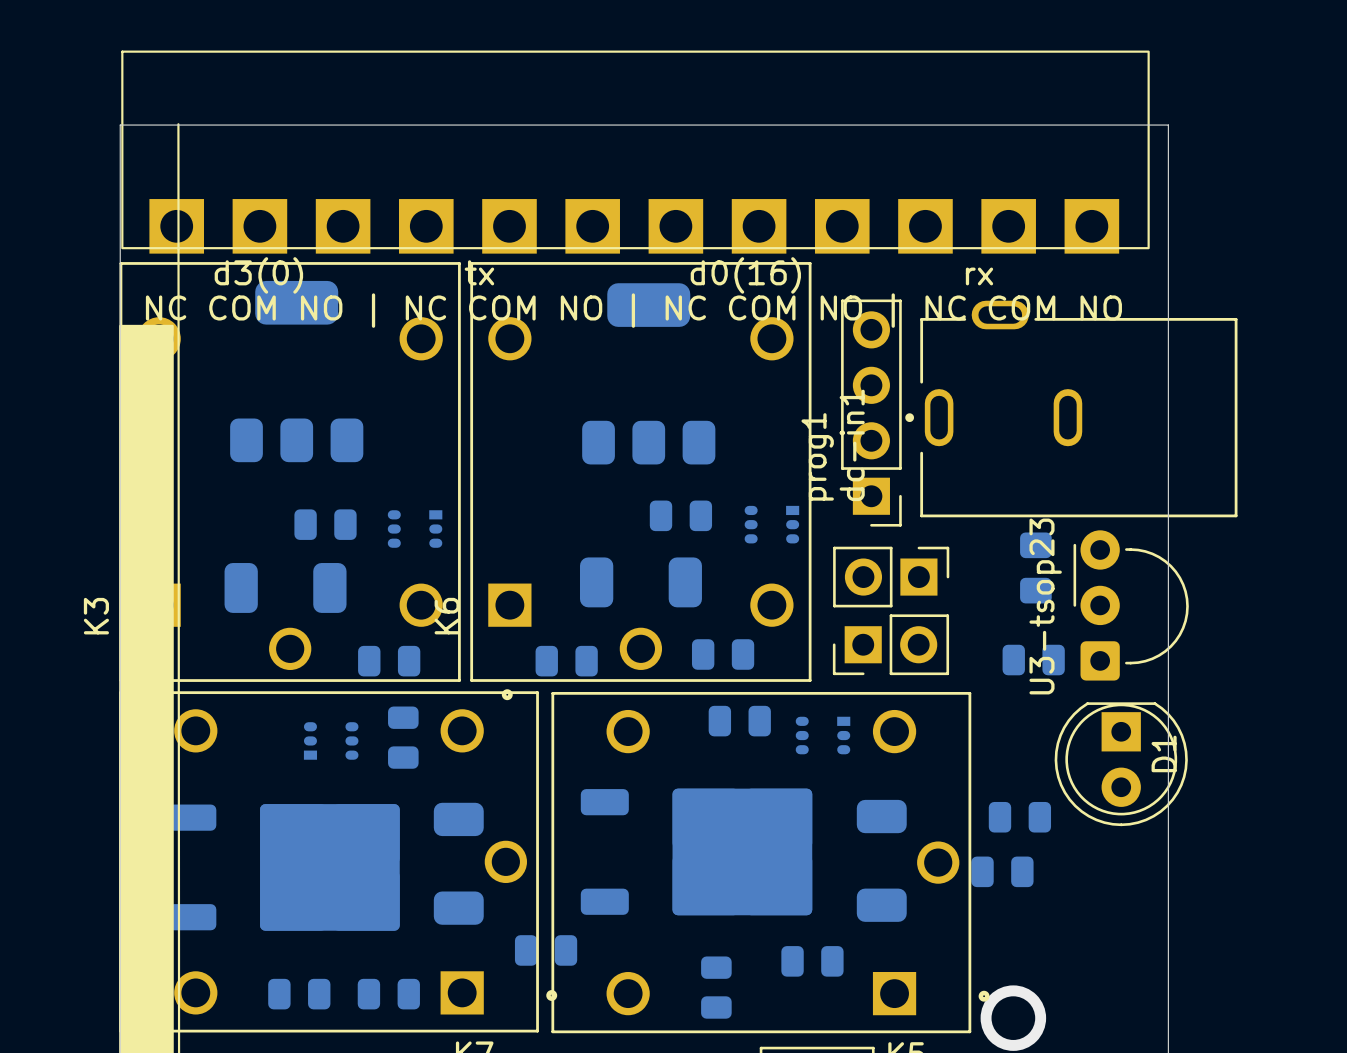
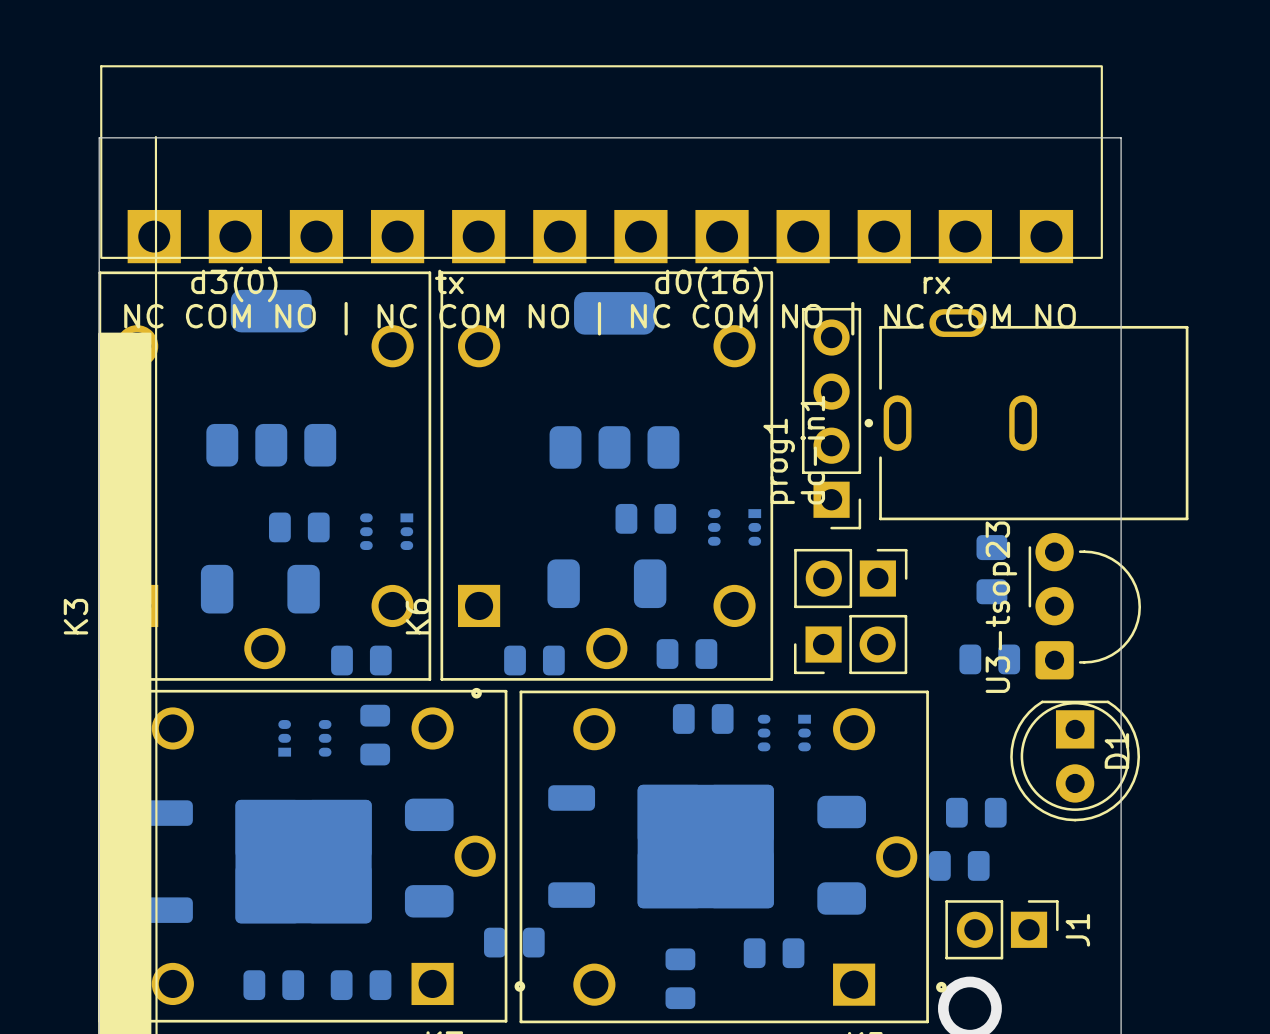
J1: none -> (1001, 929)

